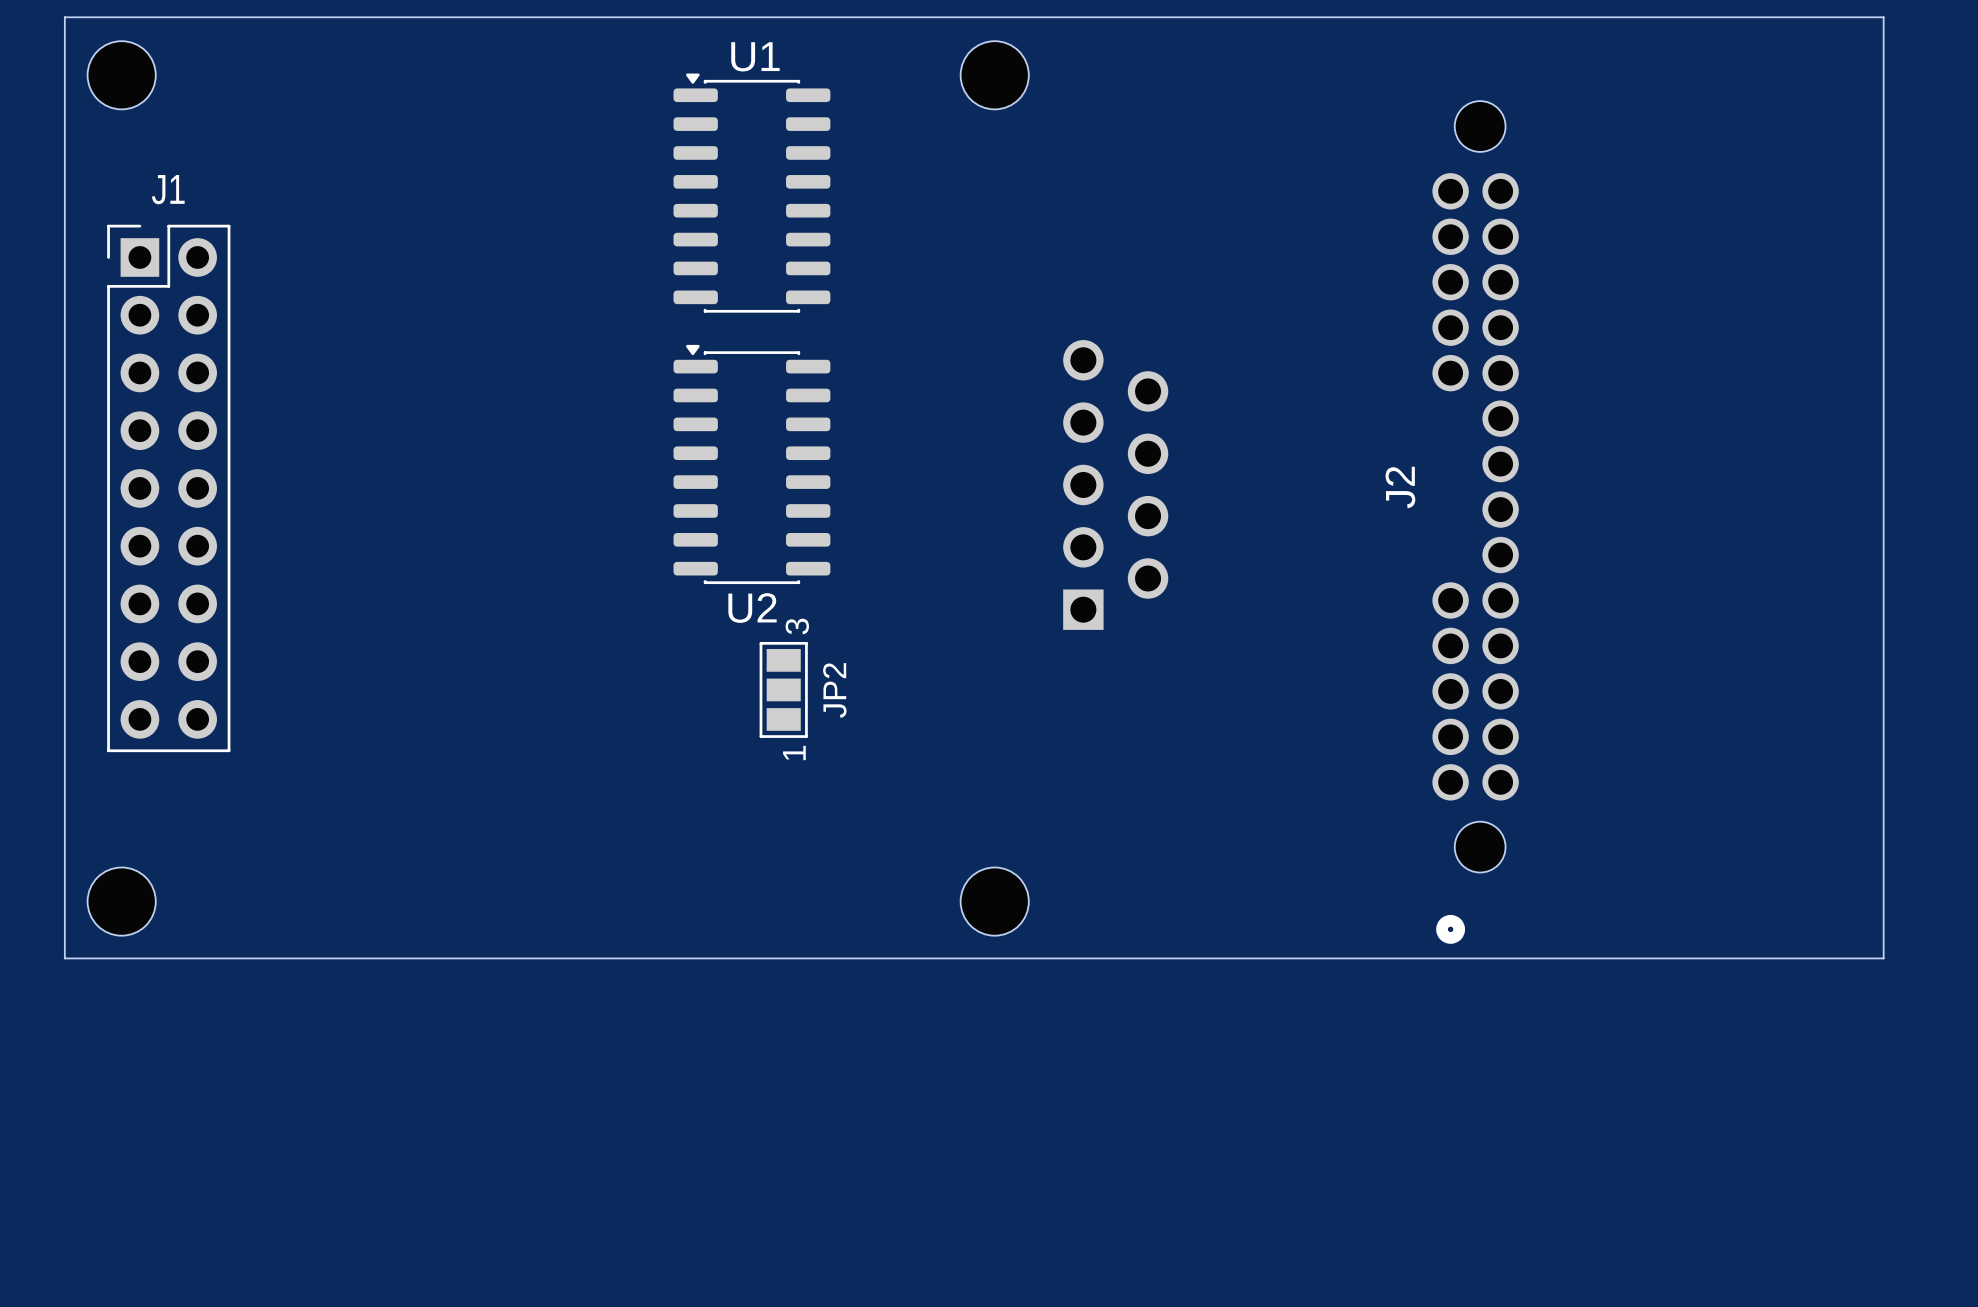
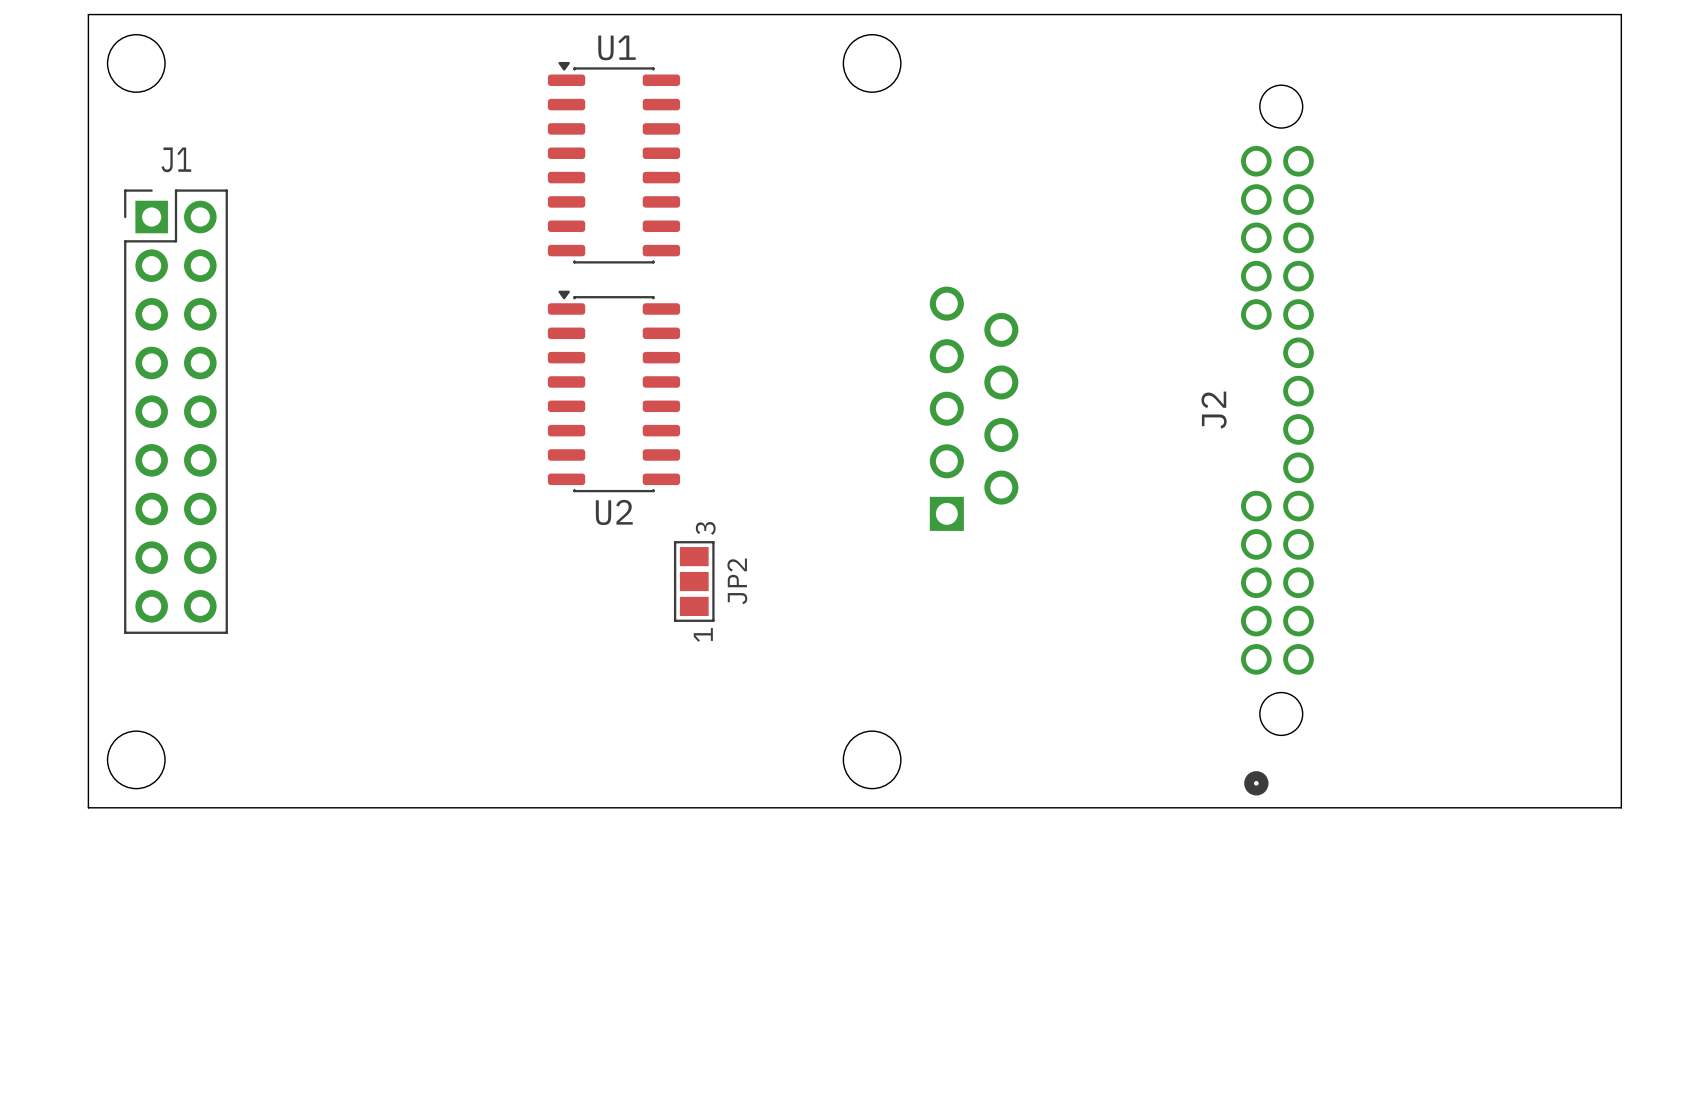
U1 position: (751, 193) -> (613, 162)
U2 position: (751, 464) -> (613, 391)

